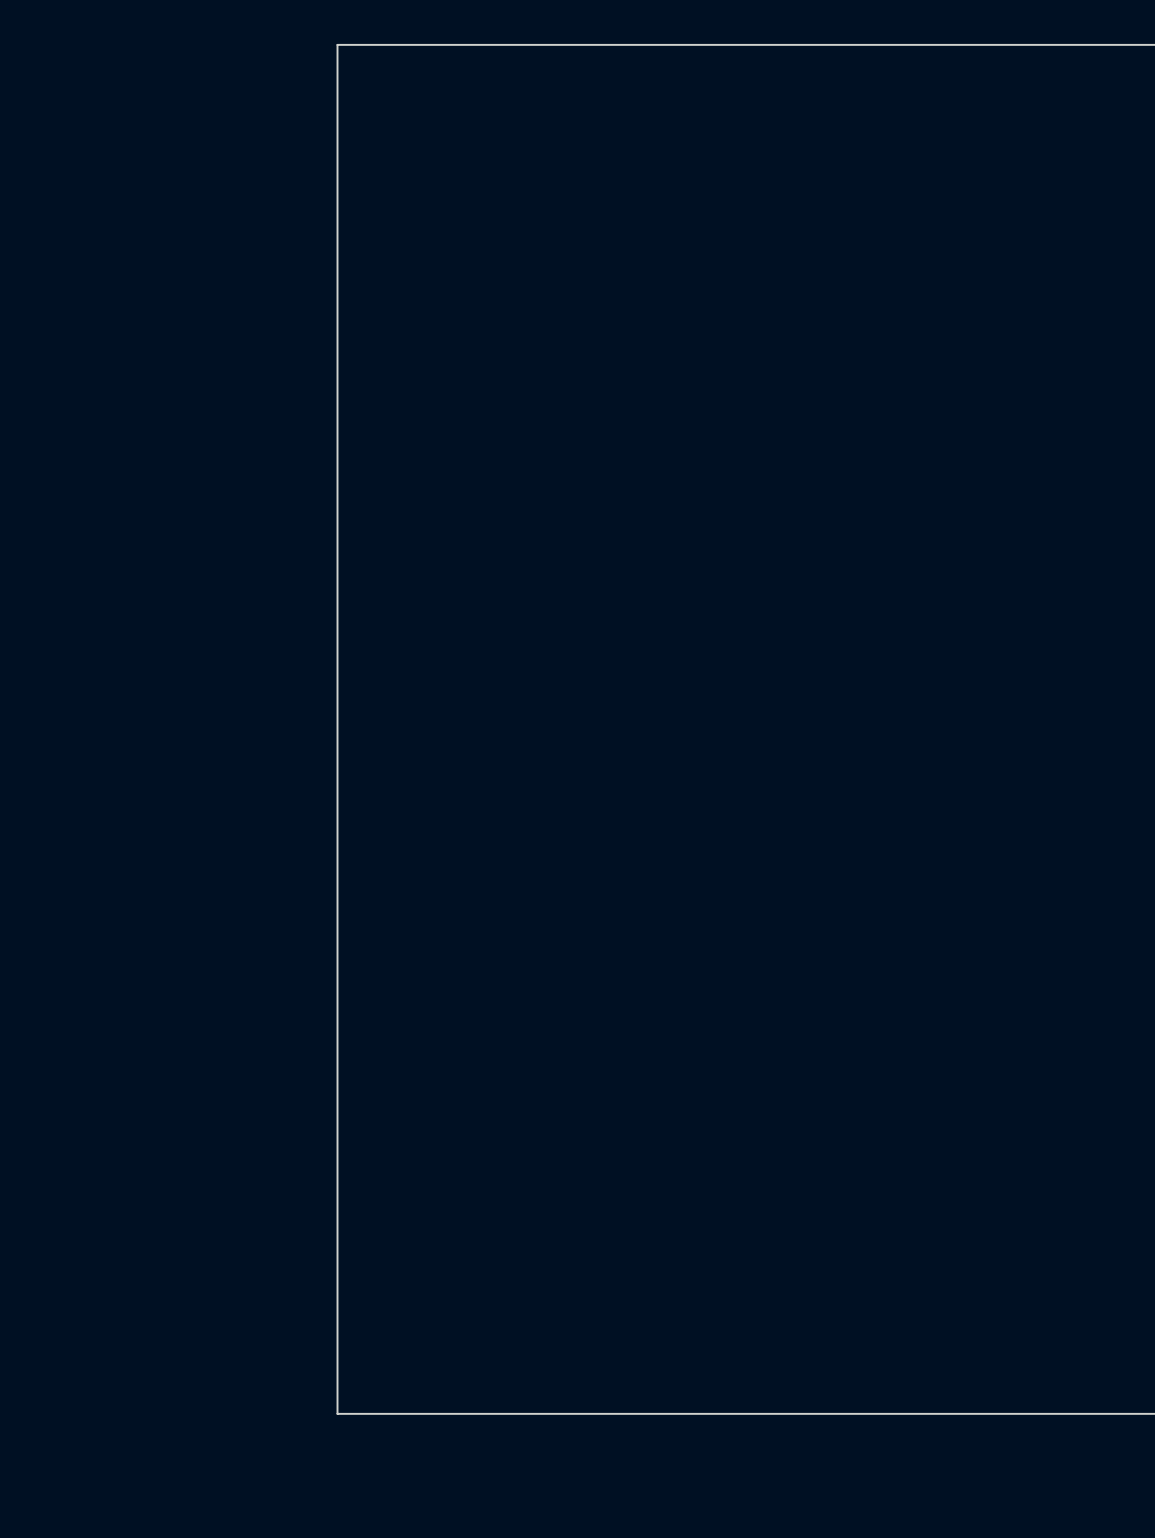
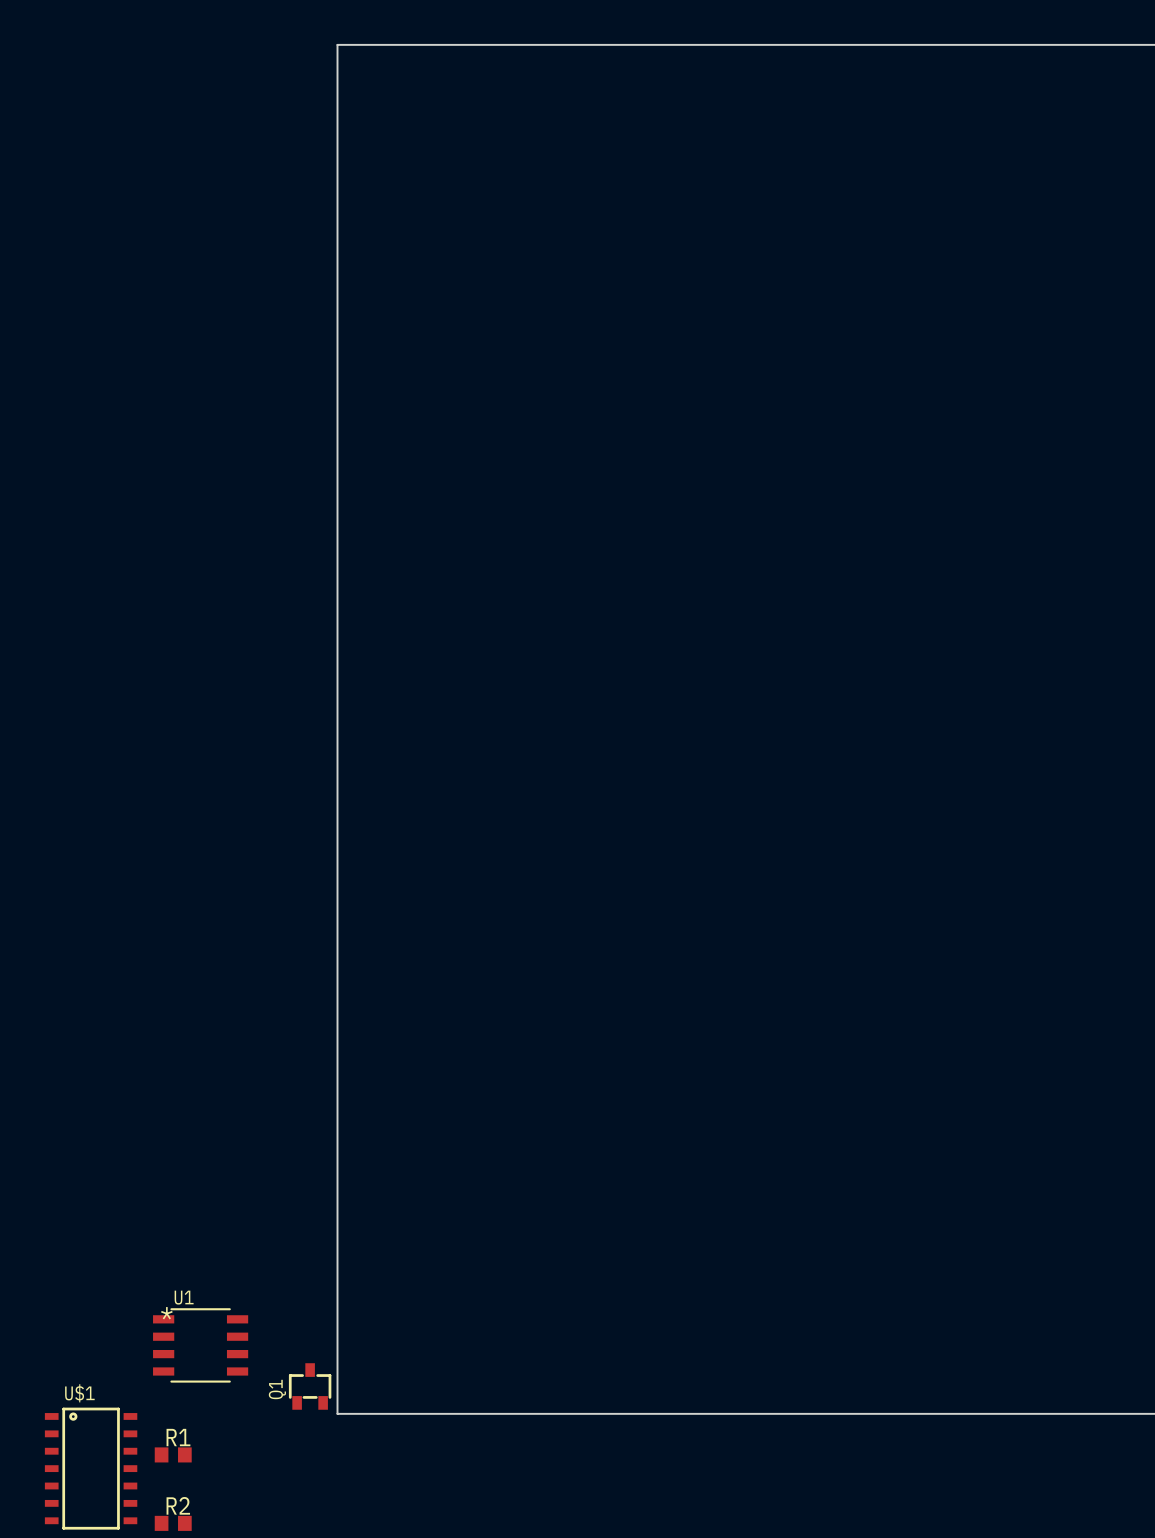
U1: none -> (200, 1345)
Q1: none -> (310, 1386)
R1: none -> (173, 1454)
U$1: none -> (91, 1468)
R2: none -> (173, 1523)

